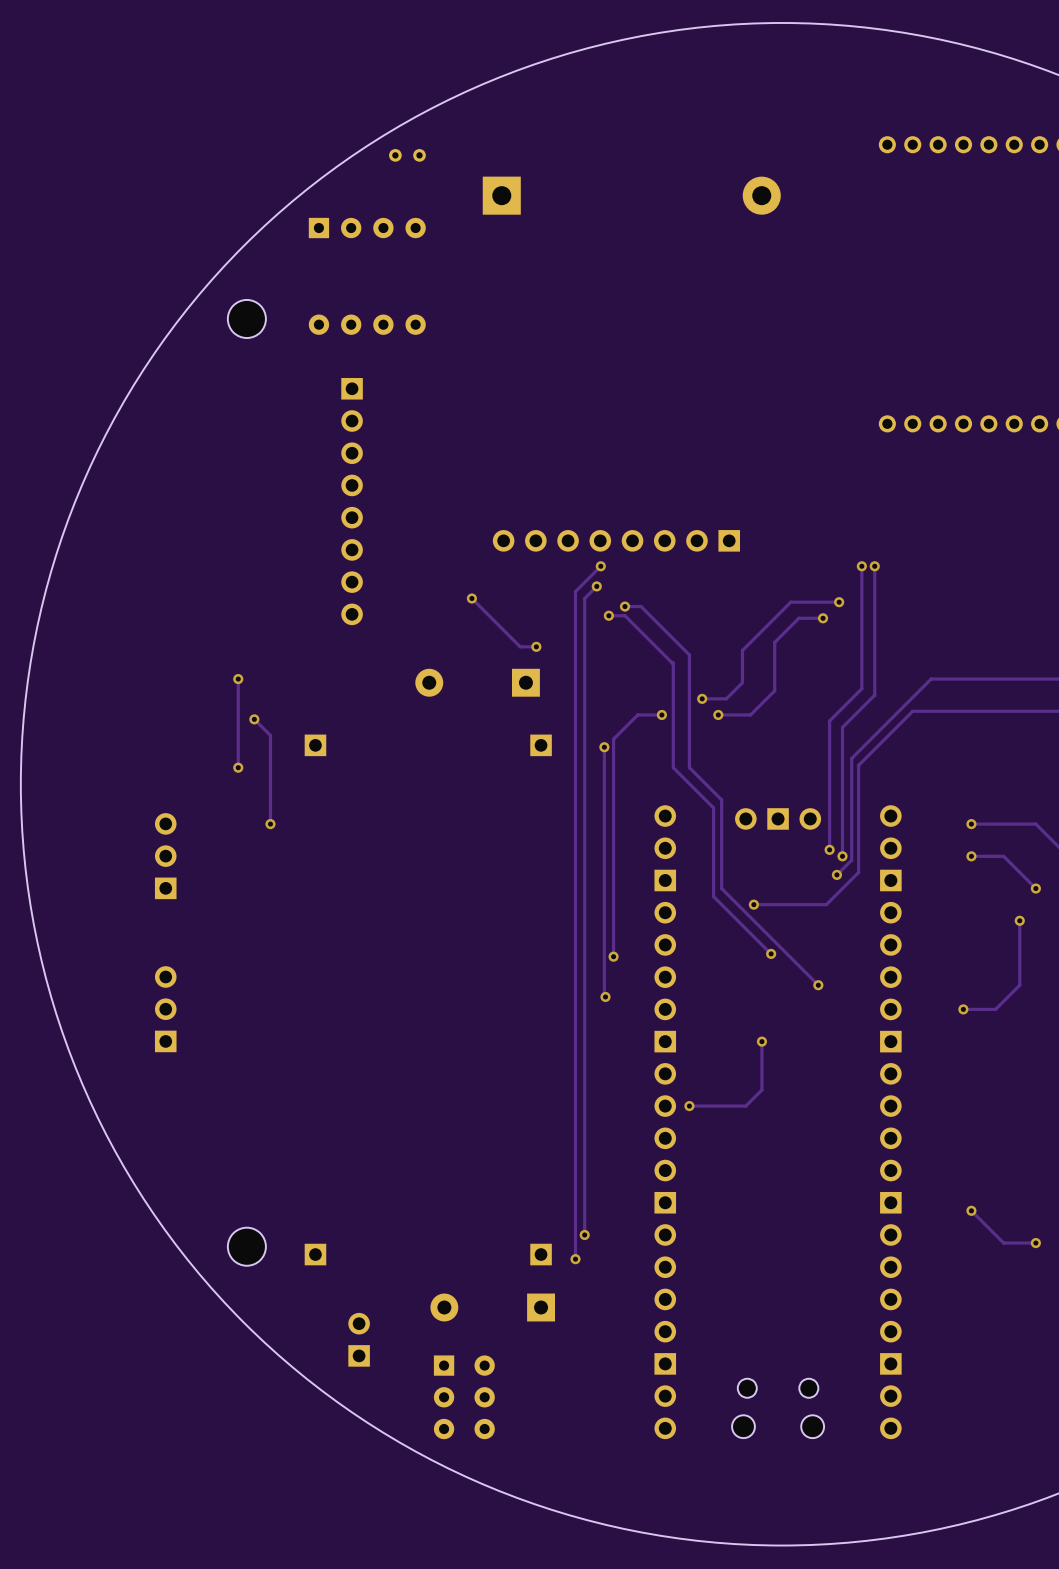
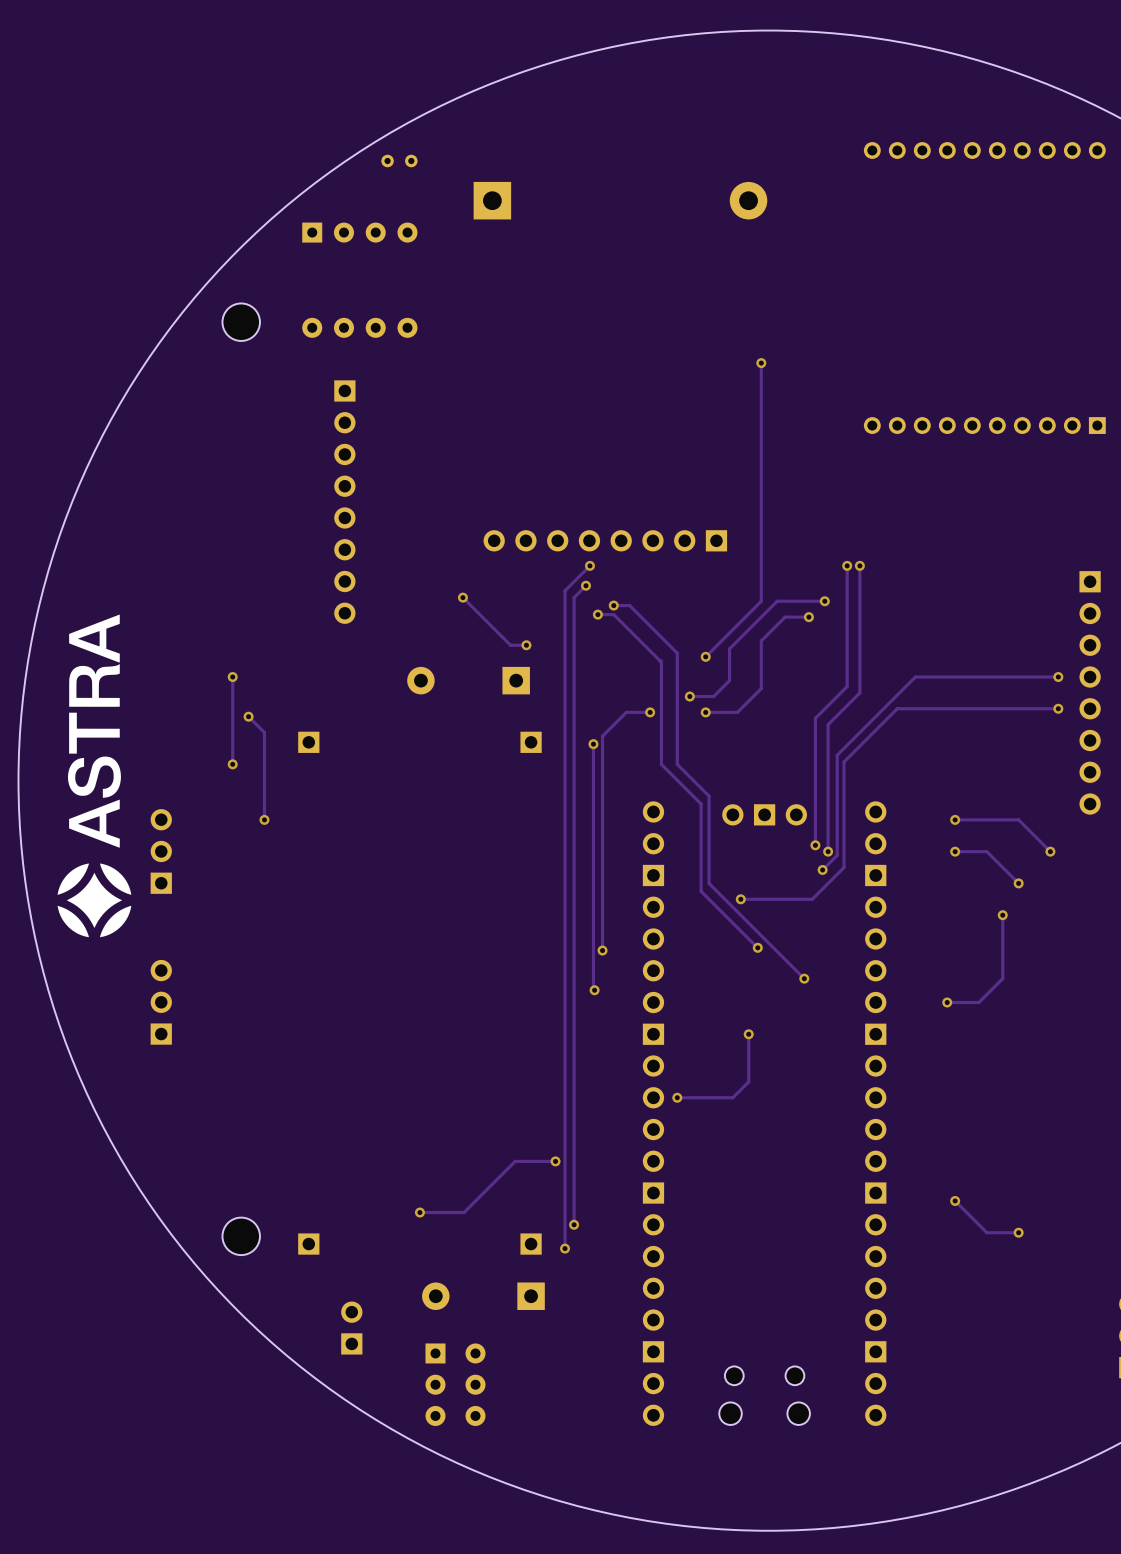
track: none -> (761, 363) (761, 601) (705, 656)
via: none -> (761, 363)
drawing: none -> [57, 614, 132, 938]
via: none -> (705, 656)
track: none -> (555, 1161) (515, 1161) (464, 1212) (419, 1212)
via: none -> (555, 1161)
via: none -> (419, 1212)

